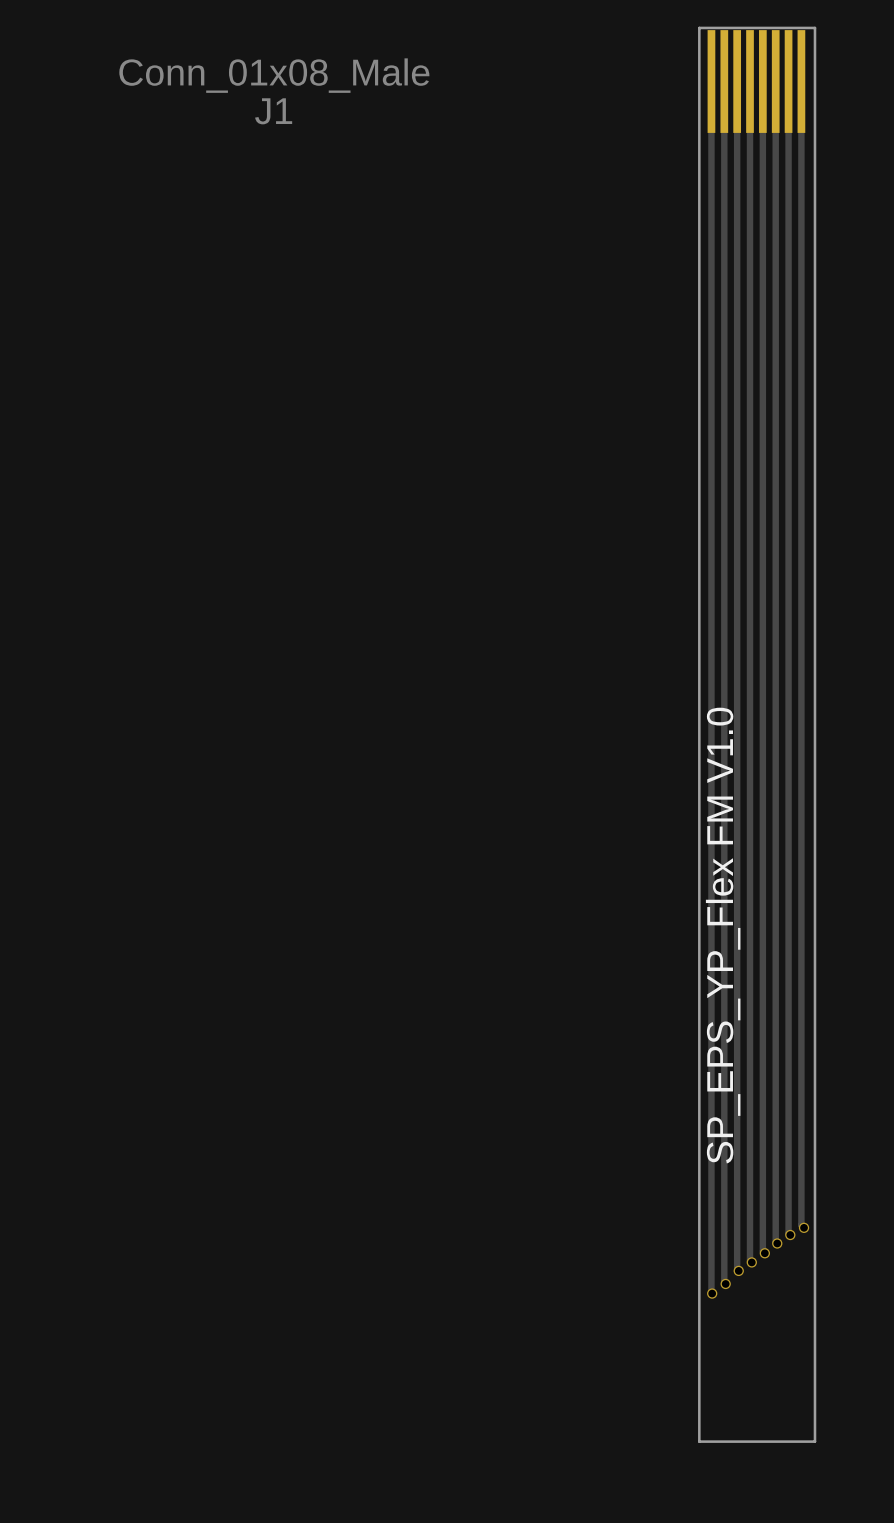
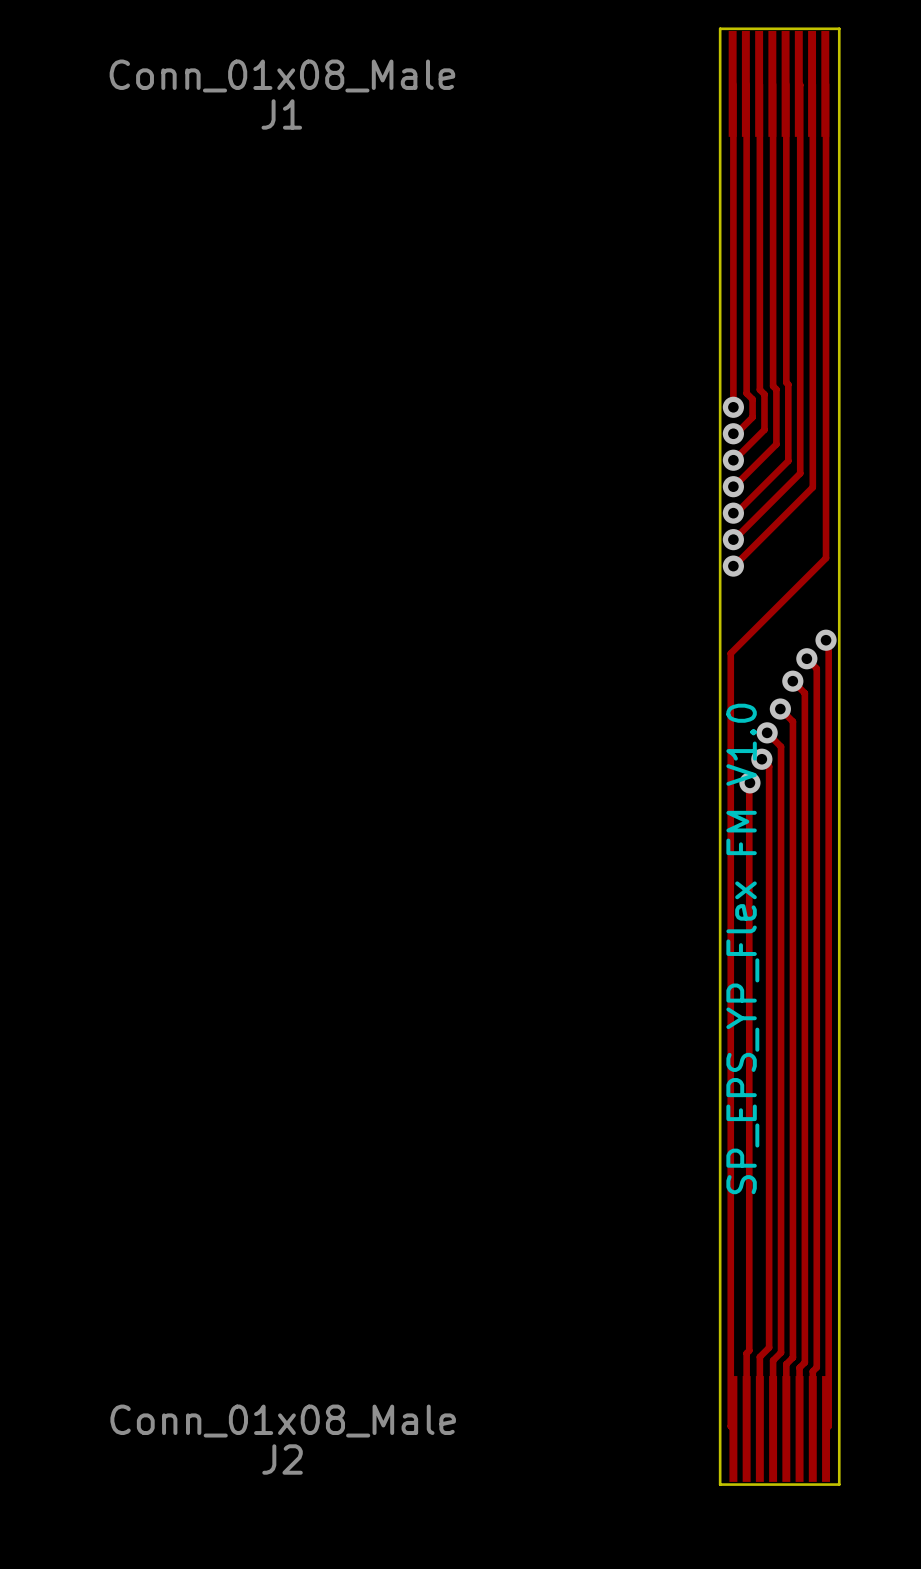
track: (711, 81) (712, 1293) -> (733, 84) (733, 407)
track: (724, 81) (725, 1283) -> (746, 84) (746, 393) (752, 399) (752, 417) (736, 433) (733, 433)
track: (737, 81) (737, 1269) (738, 1270) -> (759, 84) (759, 389) (764, 394) (764, 429) (733, 460)
track: (750, 81) (750, 1260) (751, 1262) -> (773, 84) (773, 386) (776, 389) (776, 444) (733, 486)
track: (762, 81) (762, 1251) (764, 1253) -> (786, 84) (786, 382) (788, 384) (788, 461) (736, 513) (733, 513)
track: (775, 81) (775, 1241) (777, 1243) -> (799, 84) (800, 473) (733, 539)
track: (788, 81) (788, 1233) (790, 1235) -> (812, 84) (812, 487) (733, 566)
track: (801, 81) (801, 1225) (804, 1227) -> (826, 84) (826, 558) (730, 653) (730, 1426) (733, 1428)
via: none -> (733, 407)
via: none -> (733, 433)
via: none -> (733, 460)
via: none -> (733, 486)
via: none -> (733, 513)
via: none -> (733, 539)
via: none -> (733, 566)
track: none -> (826, 640) (828, 642) (828, 1426) (826, 1428)
via: none -> (826, 640)
track: none -> (806, 658) (816, 668) (816, 1367) (812, 1371) (812, 1428)
via: none -> (806, 658)
track: none -> (792, 681) (804, 693) (804, 1362) (799, 1367) (799, 1428)
via: none -> (792, 681)
track: none -> (780, 709) (792, 721) (792, 1357) (786, 1364) (786, 1428)
via: none -> (780, 709)
track: none -> (767, 732) (781, 746) (781, 1352) (773, 1360) (773, 1428)
via: none -> (767, 732)
track: none -> (761, 759) (769, 766) (769, 1347) (759, 1356) (759, 1428)
via: none -> (761, 759)
track: none -> (749, 782) (749, 1350) (746, 1353) (746, 1428)
via: none -> (749, 782)
via: (804, 1227) -> none
via: (790, 1235) -> none
via: (777, 1243) -> none
via: (764, 1253) -> none
via: (751, 1262) -> none
via: (738, 1270) -> none
via: (725, 1283) -> none
via: (712, 1293) -> none
J2: none -> Conn_01x08_Male (779, 1428)

